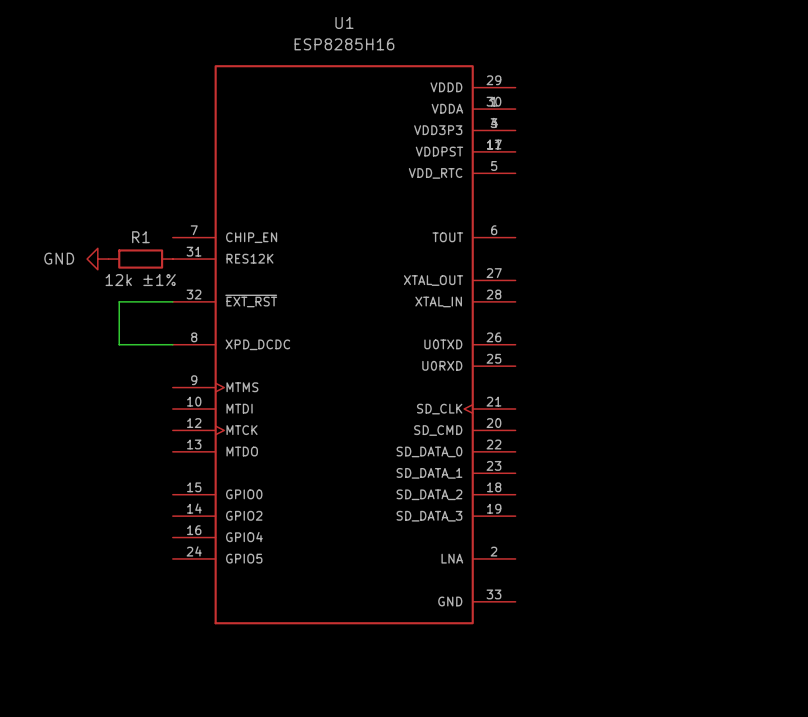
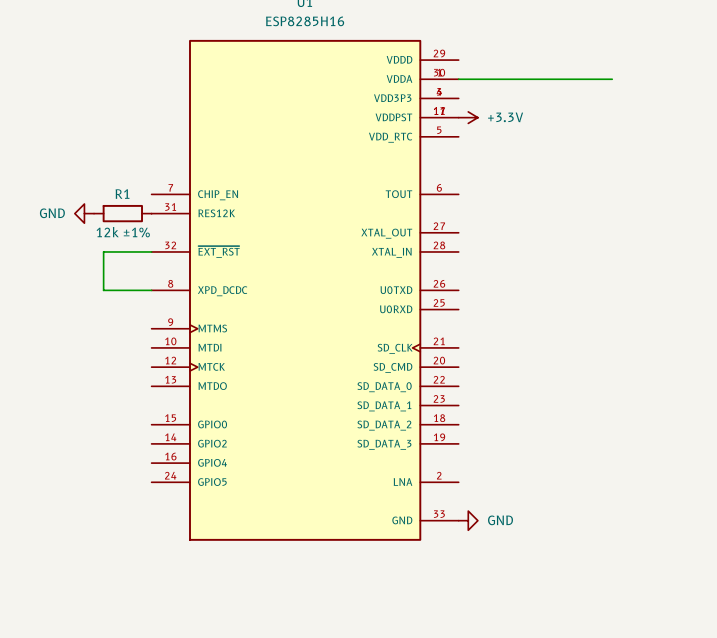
wire: none -> (458, 79) (612, 79)
power symbol: none -> +3.3V (468, 117)
power symbol: none -> GND (468, 520)

